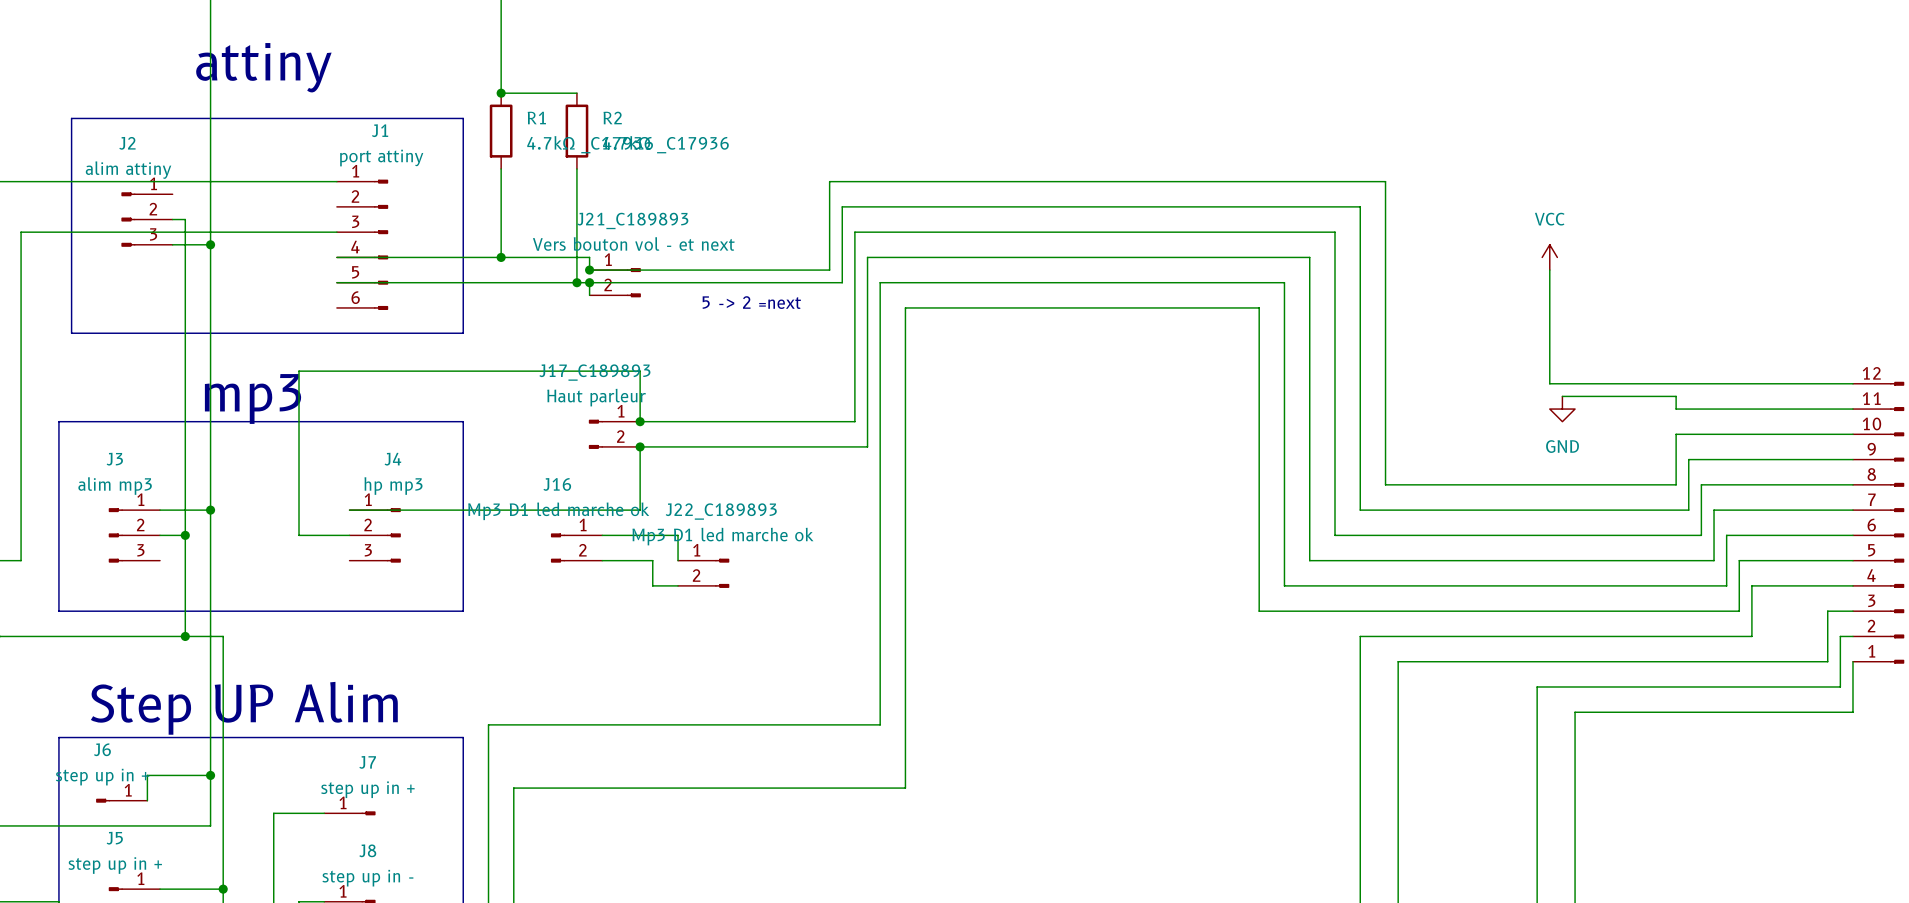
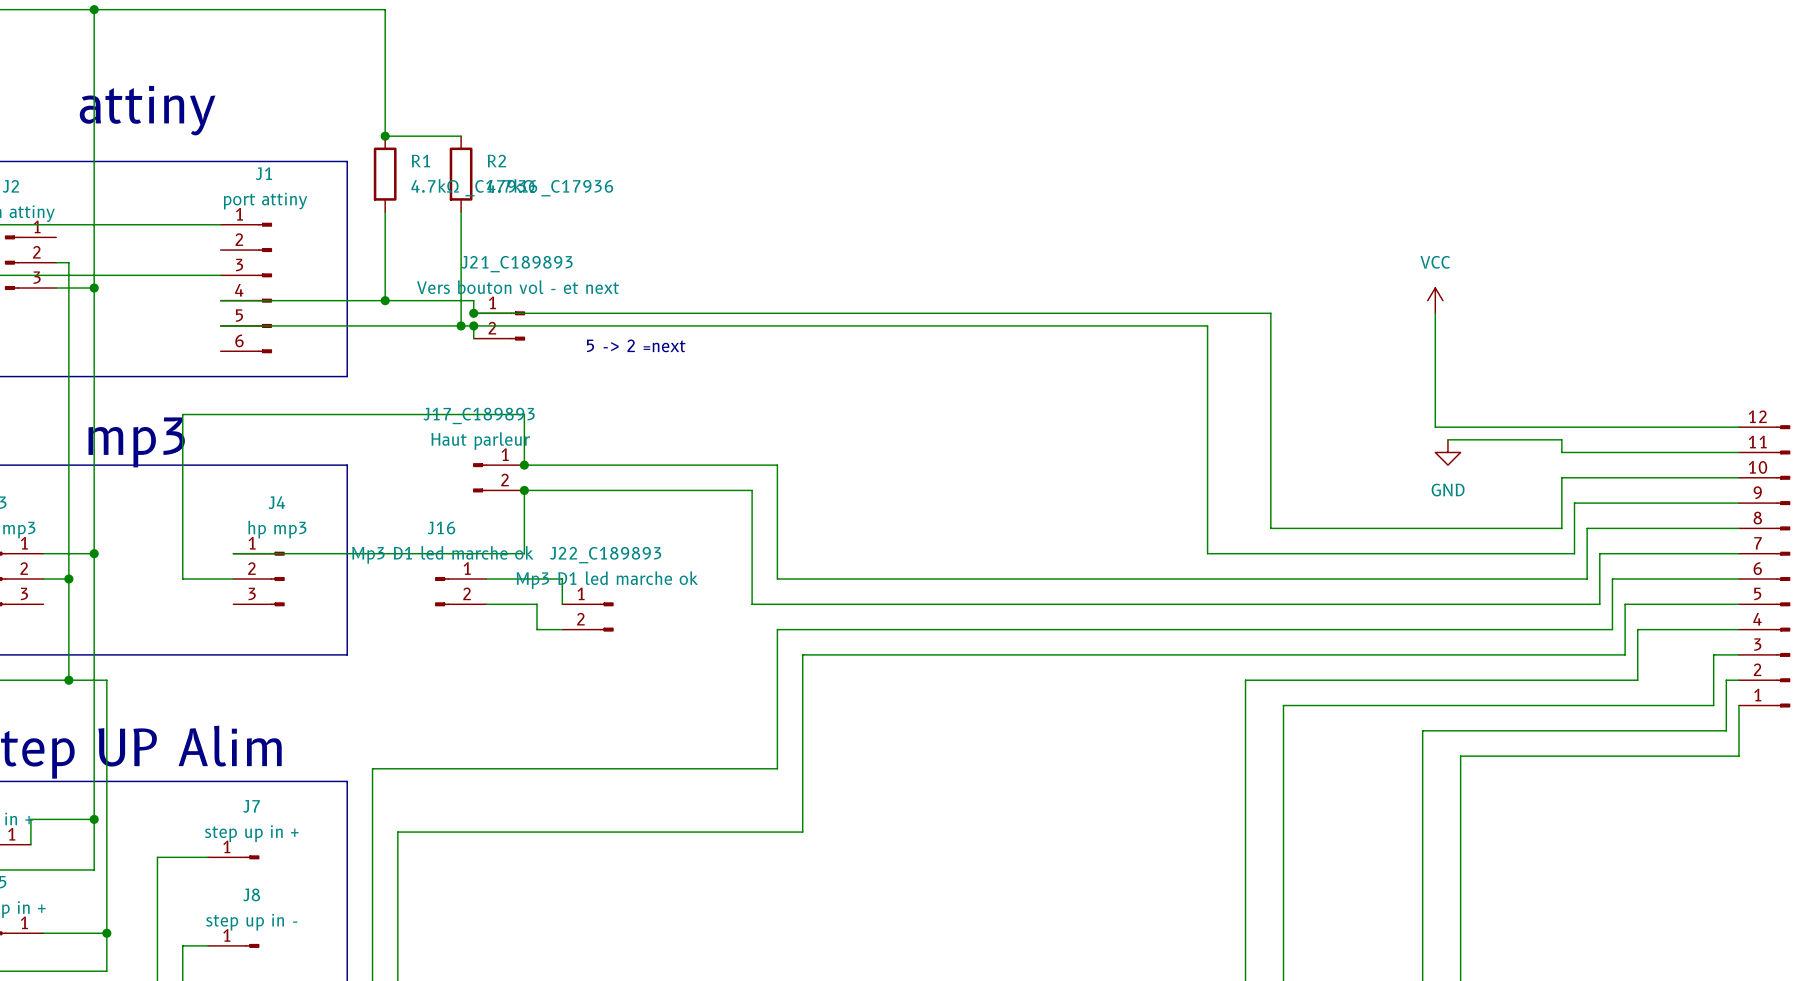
wire: (829, 270) (829, 181) (1385, 181) (1385, 270) -> (714, 313) (1270, 313)
wire: (842, 282) (842, 206) (1360, 206) (1360, 510) -> none
wire: (880, 282) (880, 724) -> (764, 325) (726, 325)
wire: (1284, 282) (1284, 585) -> (1169, 325) (1207, 325) (1207, 553) (1245, 553)
wire: (854, 421) (854, 232) (1334, 232) (1334, 535) -> (739, 465) (777, 465) (777, 579) (1220, 579)
wire: (867, 446) (867, 257) (1309, 257) (1309, 560) -> (752, 490) (752, 604) (1194, 604)
wire: none -> (1169, 629) (777, 629) (777, 768) (764, 768)
wire: (1259, 611) (1259, 307) (905, 307) (905, 788) -> (1144, 654) (802, 654) (802, 832) (790, 832)

